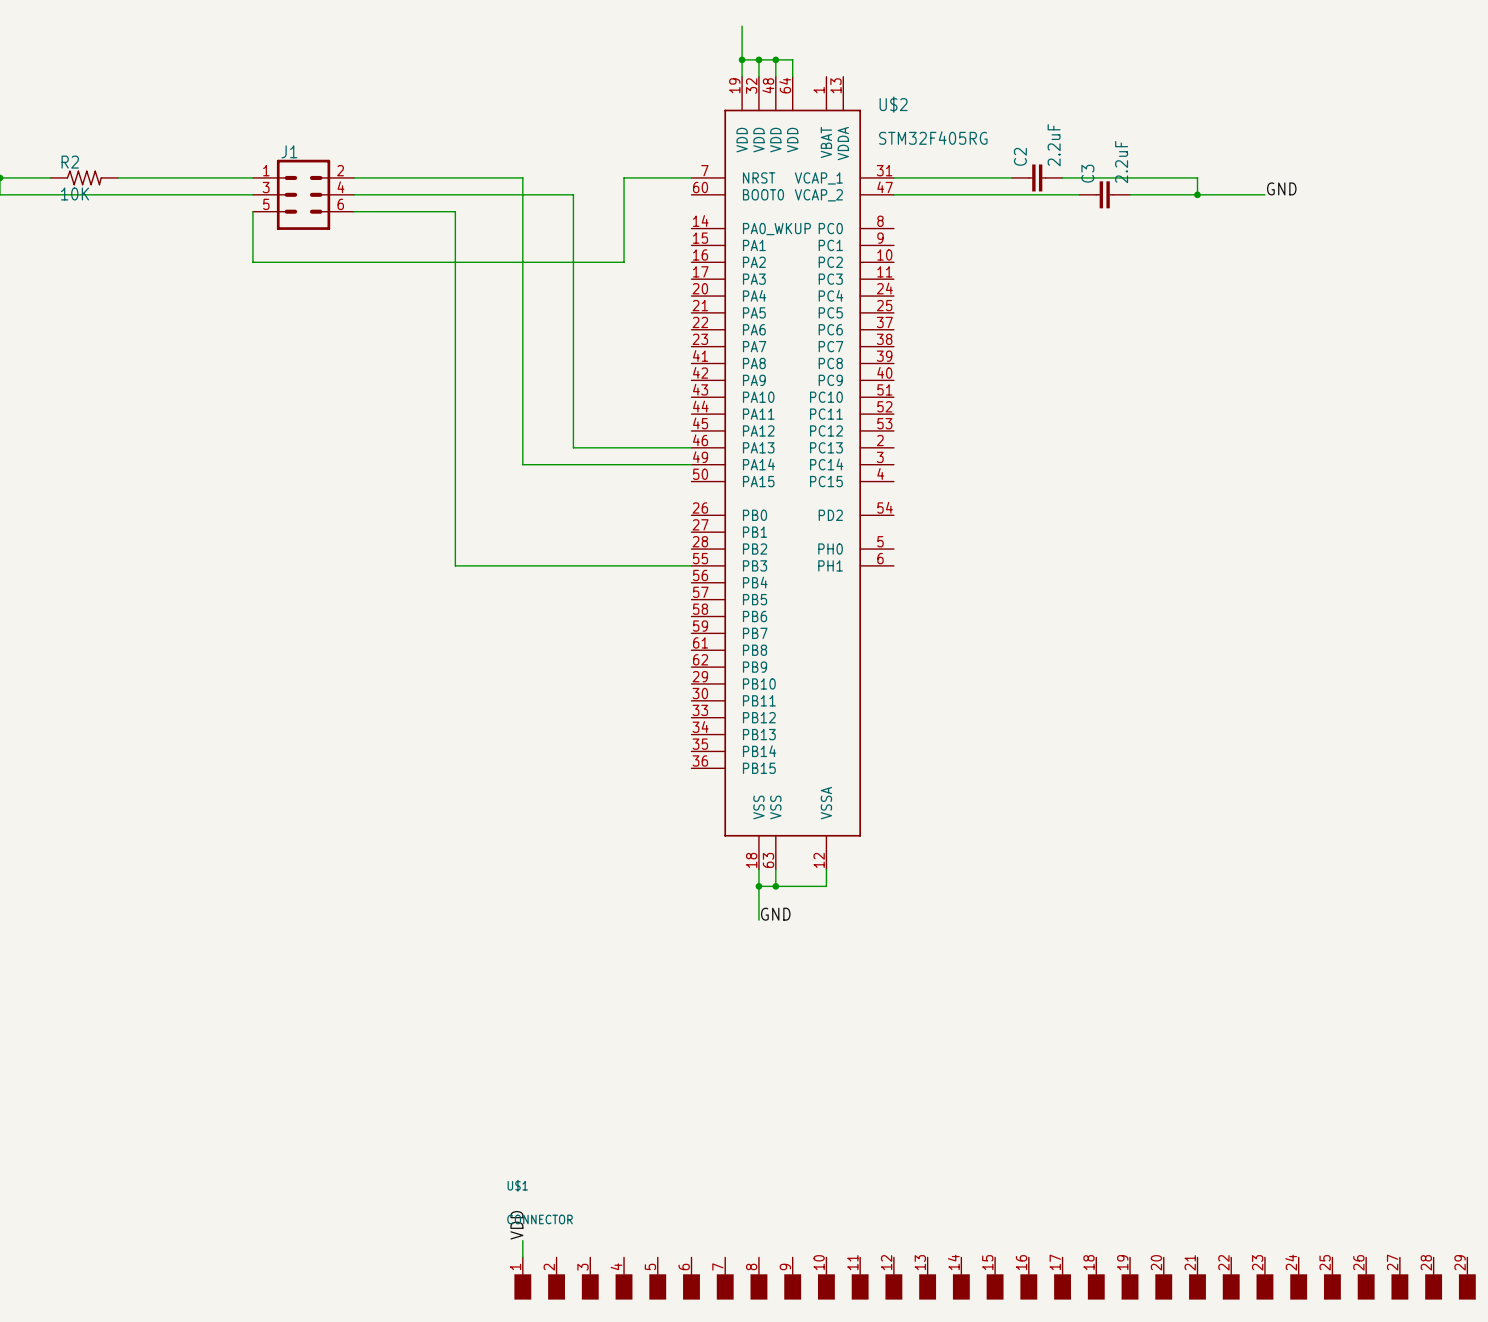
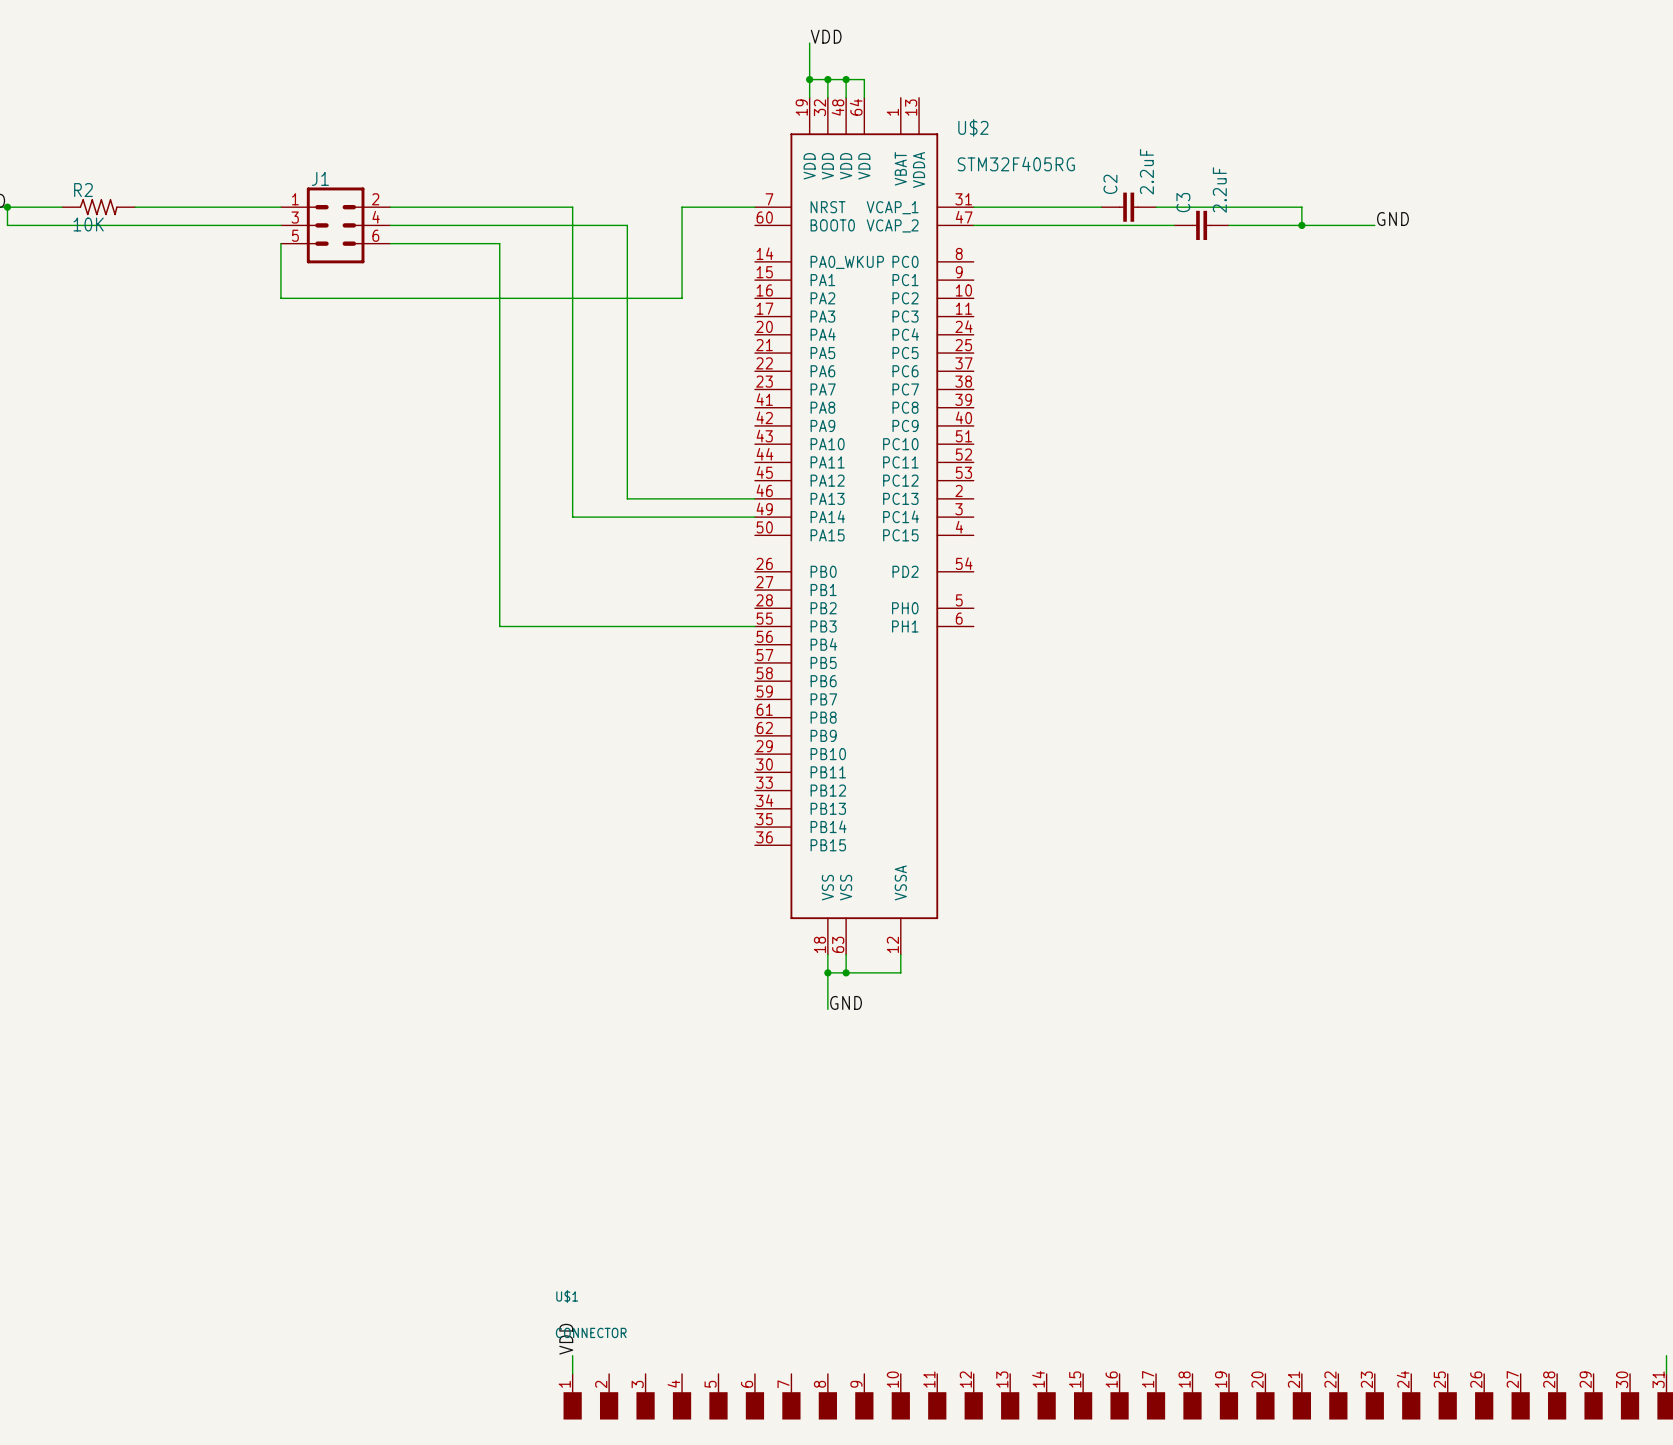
label: none -> VDD (826, 36)

